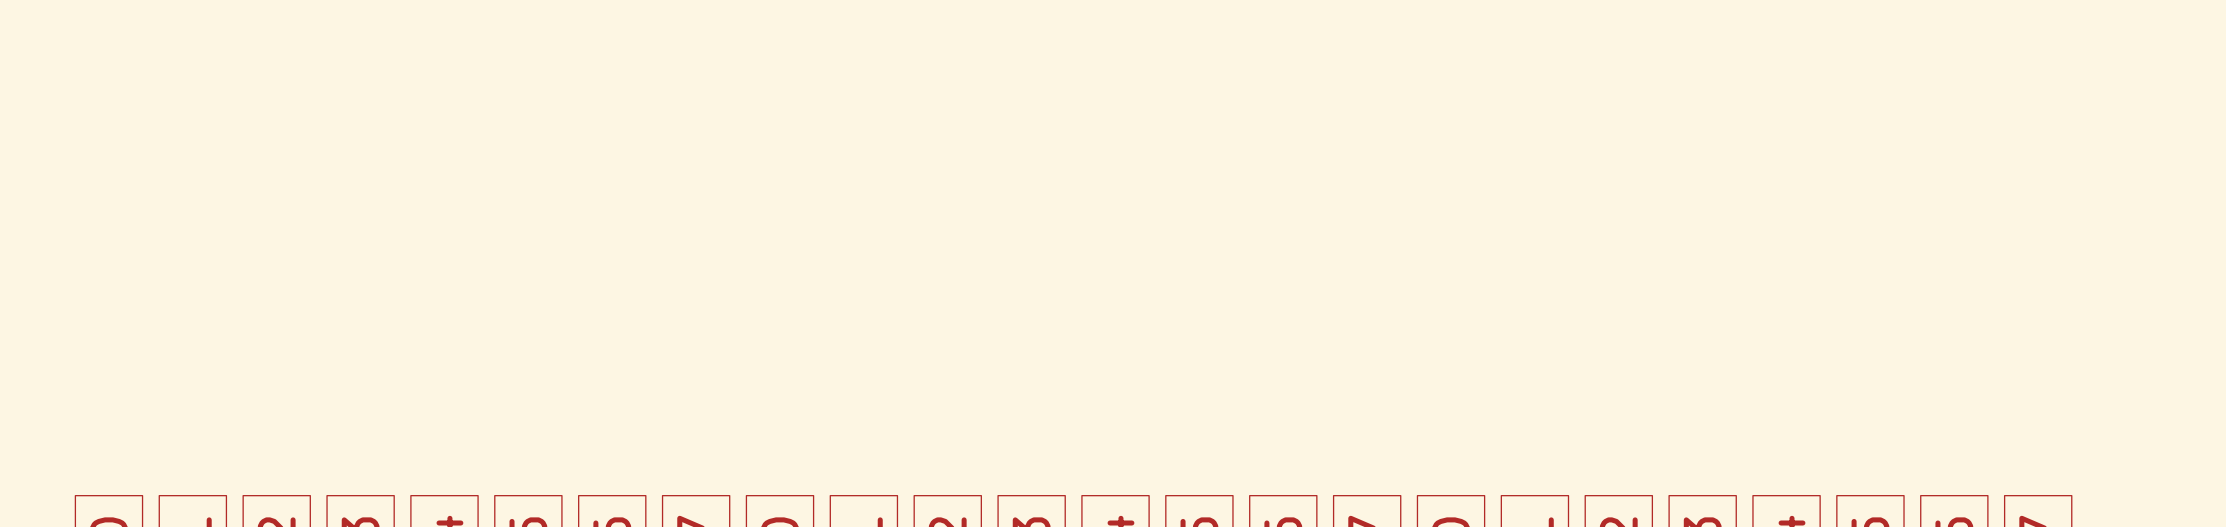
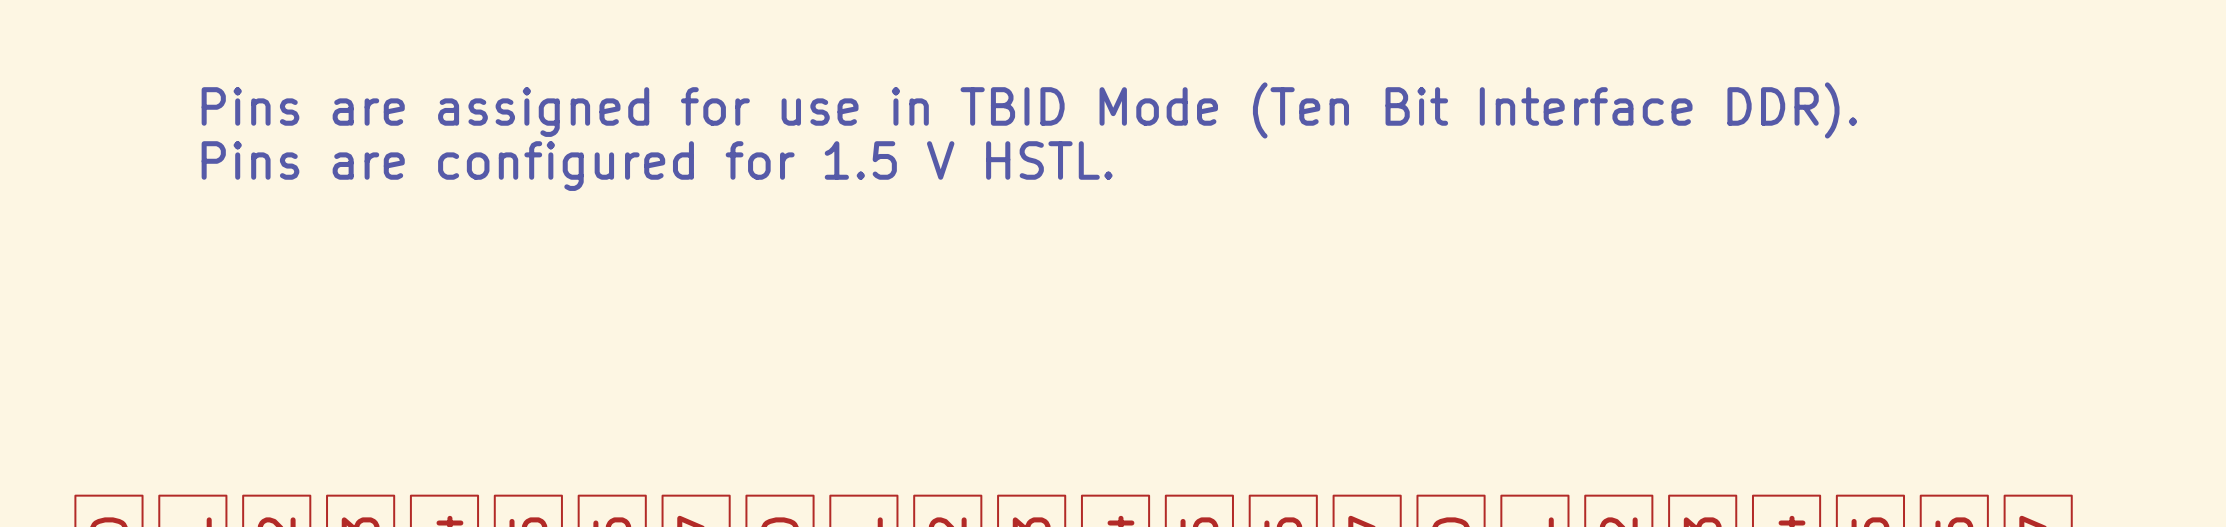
text: none -> Pins are assigned for use in TBID Mode (Ten Bit Interface DDR). (1029, 110)
text: none -> Pins are configured for 1.5 V HSTL. (657, 166)

